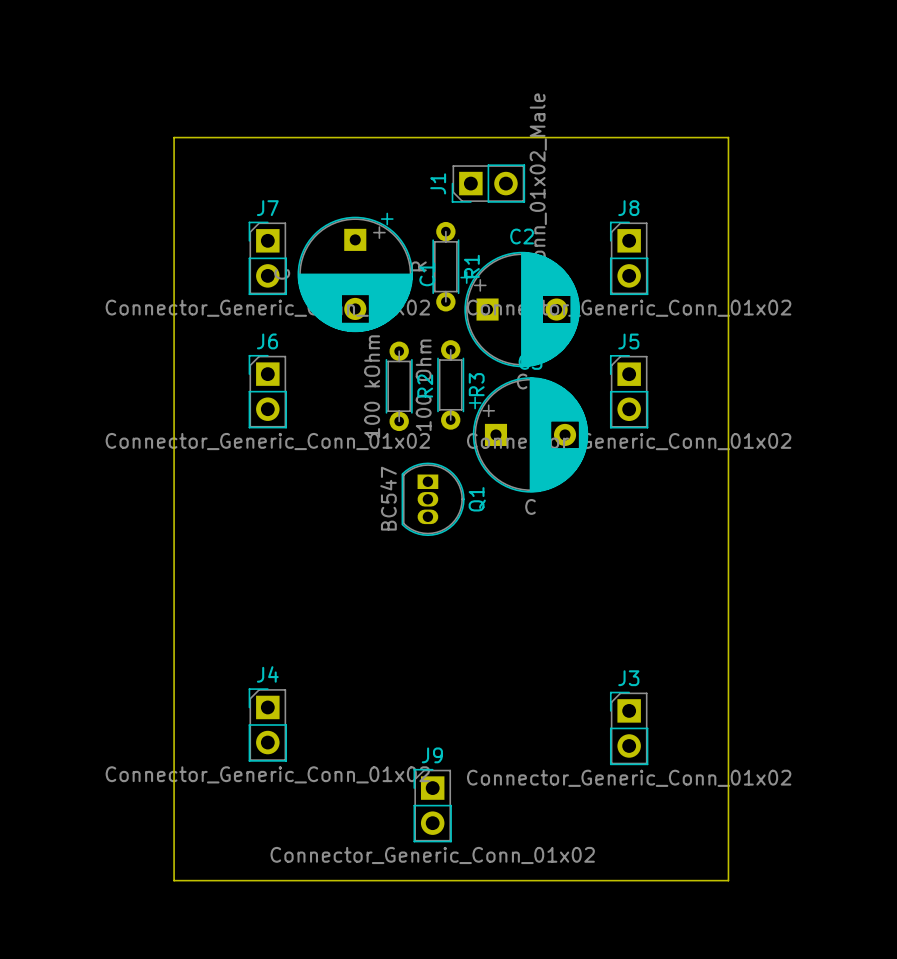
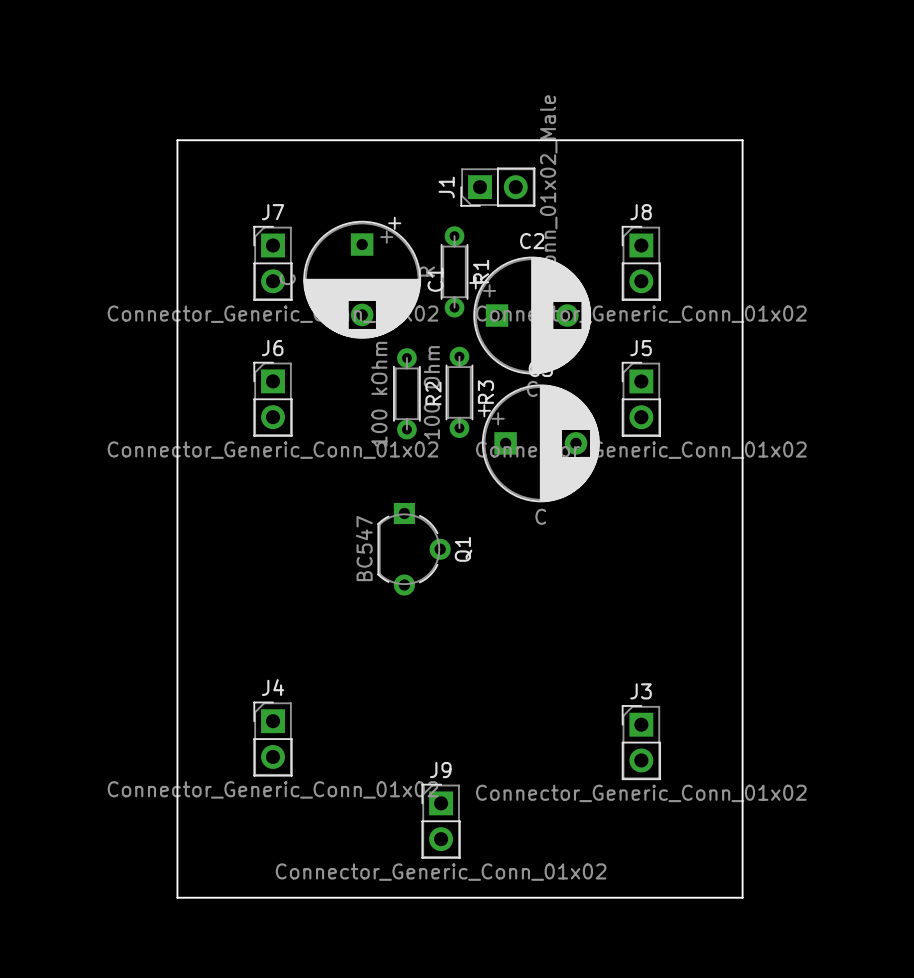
Q1 footprint: [401, 462, 465, 537] -> [377, 502, 451, 596]

